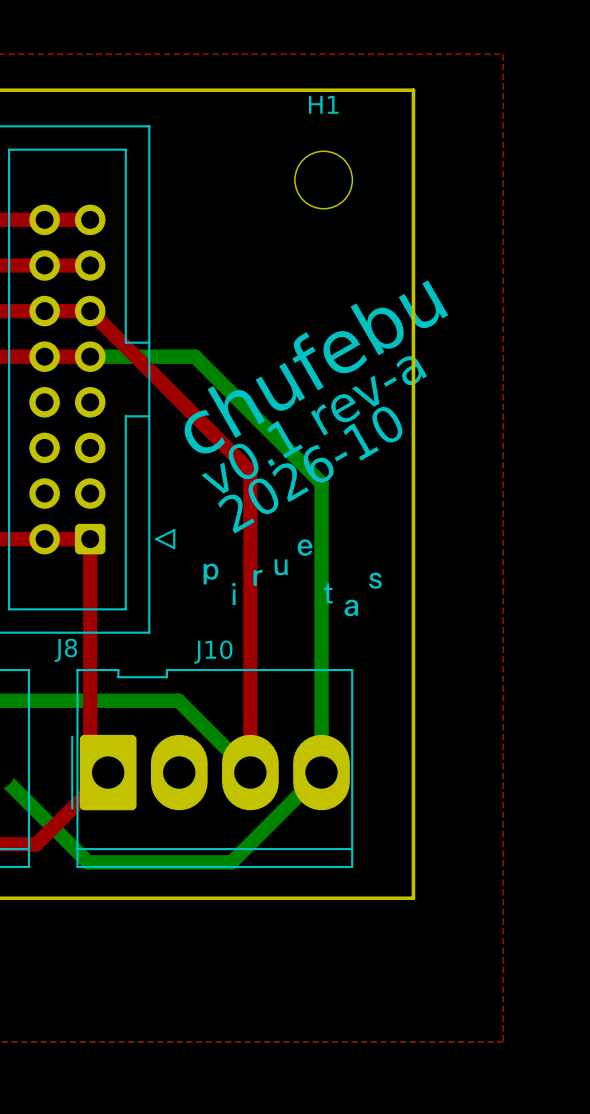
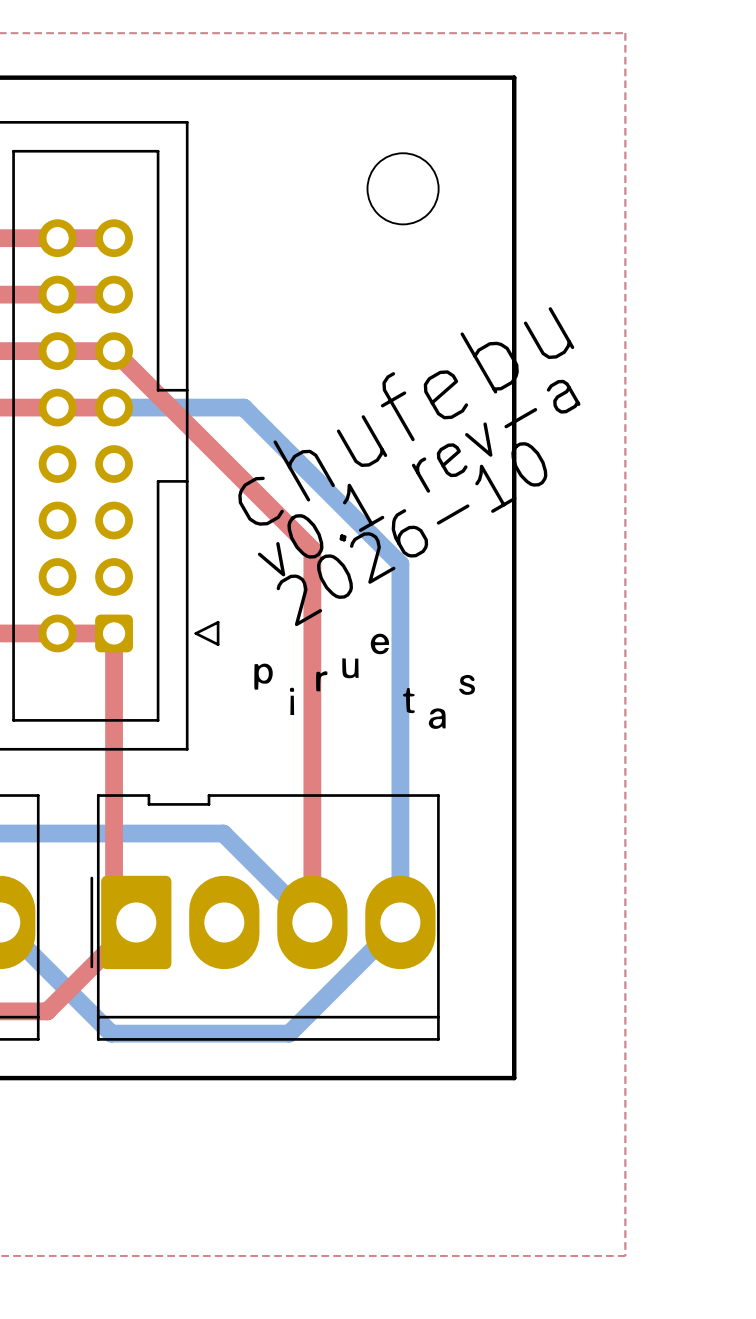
H1 name: H1 (323, 104) -> none
J8 name: J8 (65, 650) -> none
J10 name: J10 (213, 652) -> none

